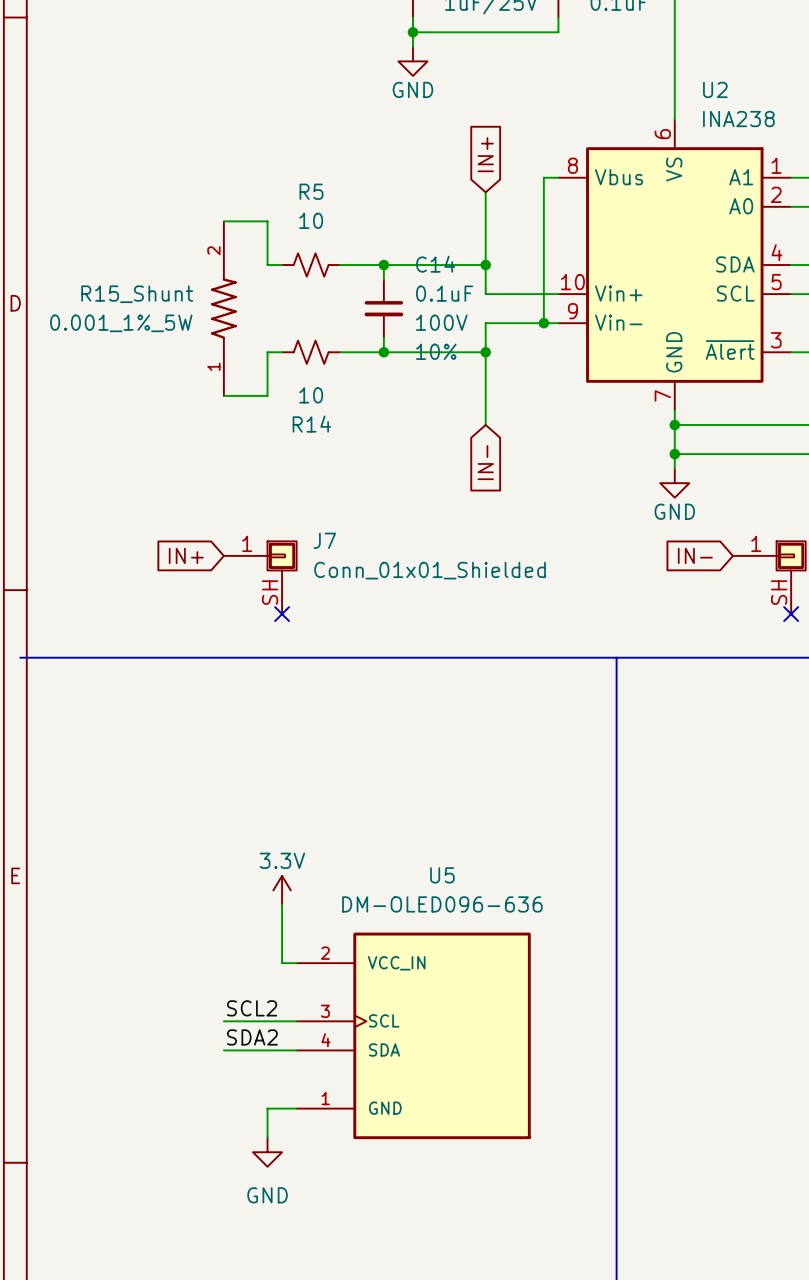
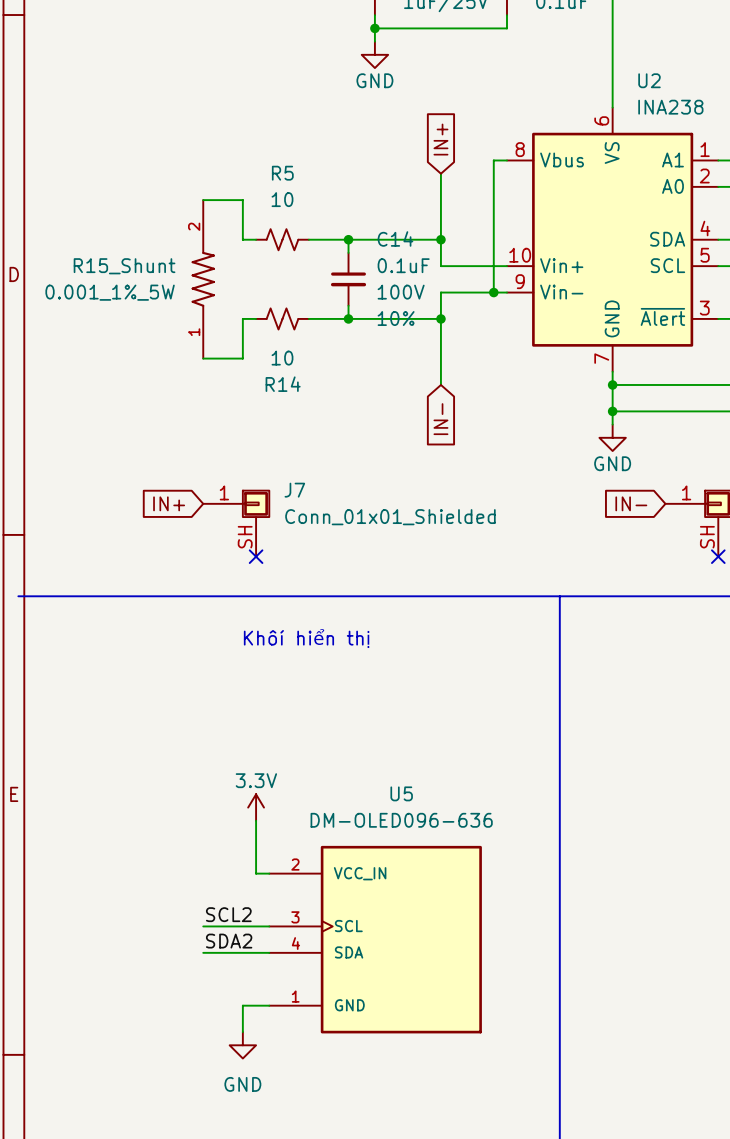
text: none -> Khôí hiển thị (306, 638)

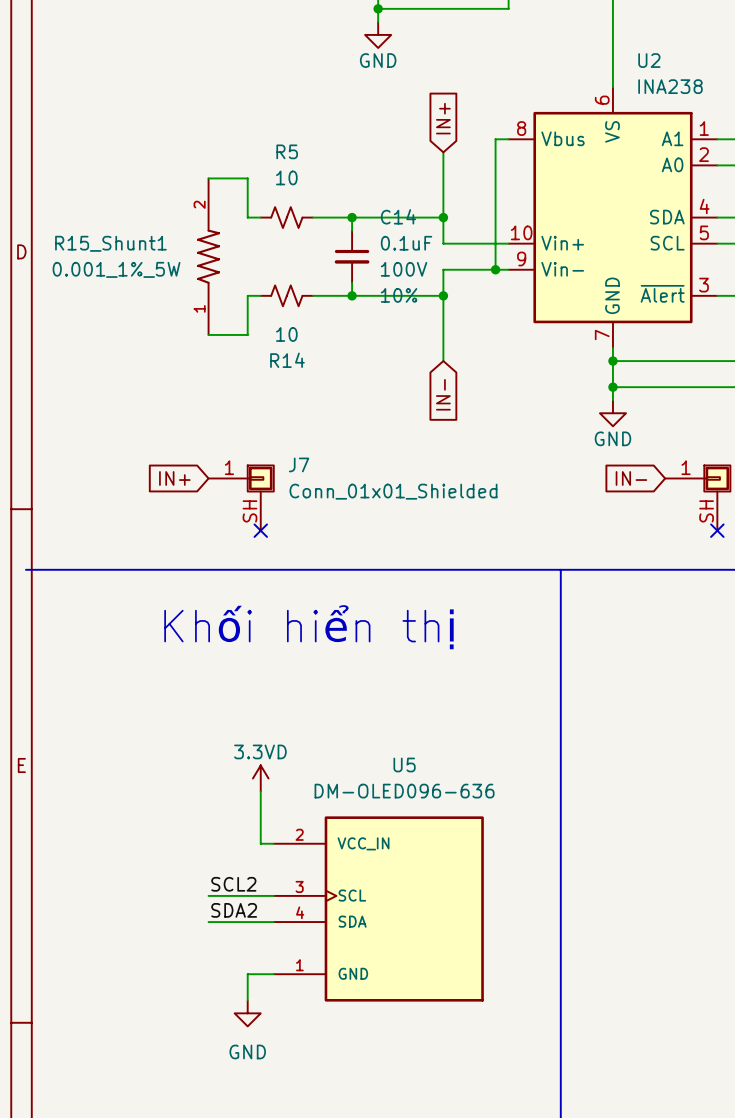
R15_Shunt name: R15_Shunt (124, 266) -> R15_Shunt1 (110, 243)
text: Khôí hiển thị (306, 638) -> Khối hiển thị (309, 627)
power symbol: 3.3V (256, 807) -> 3.3VD (260, 778)

